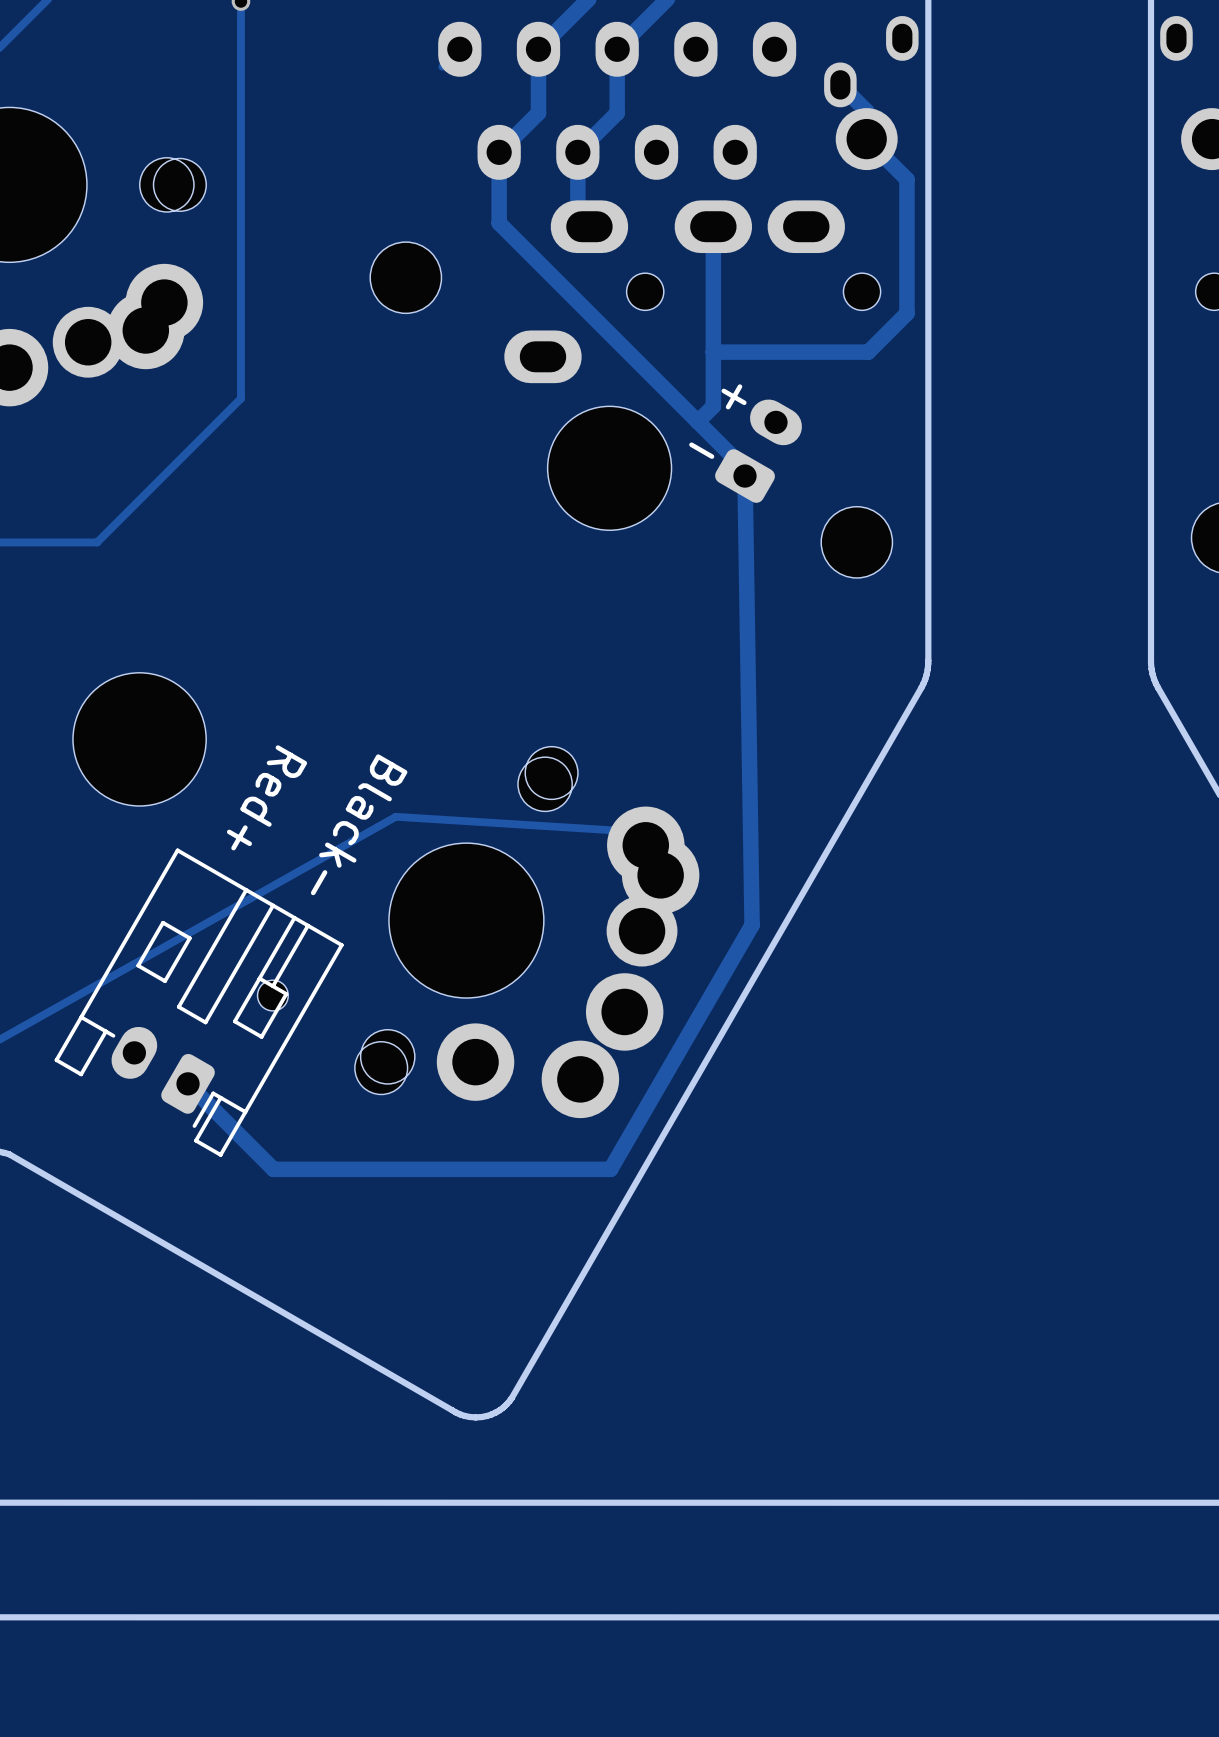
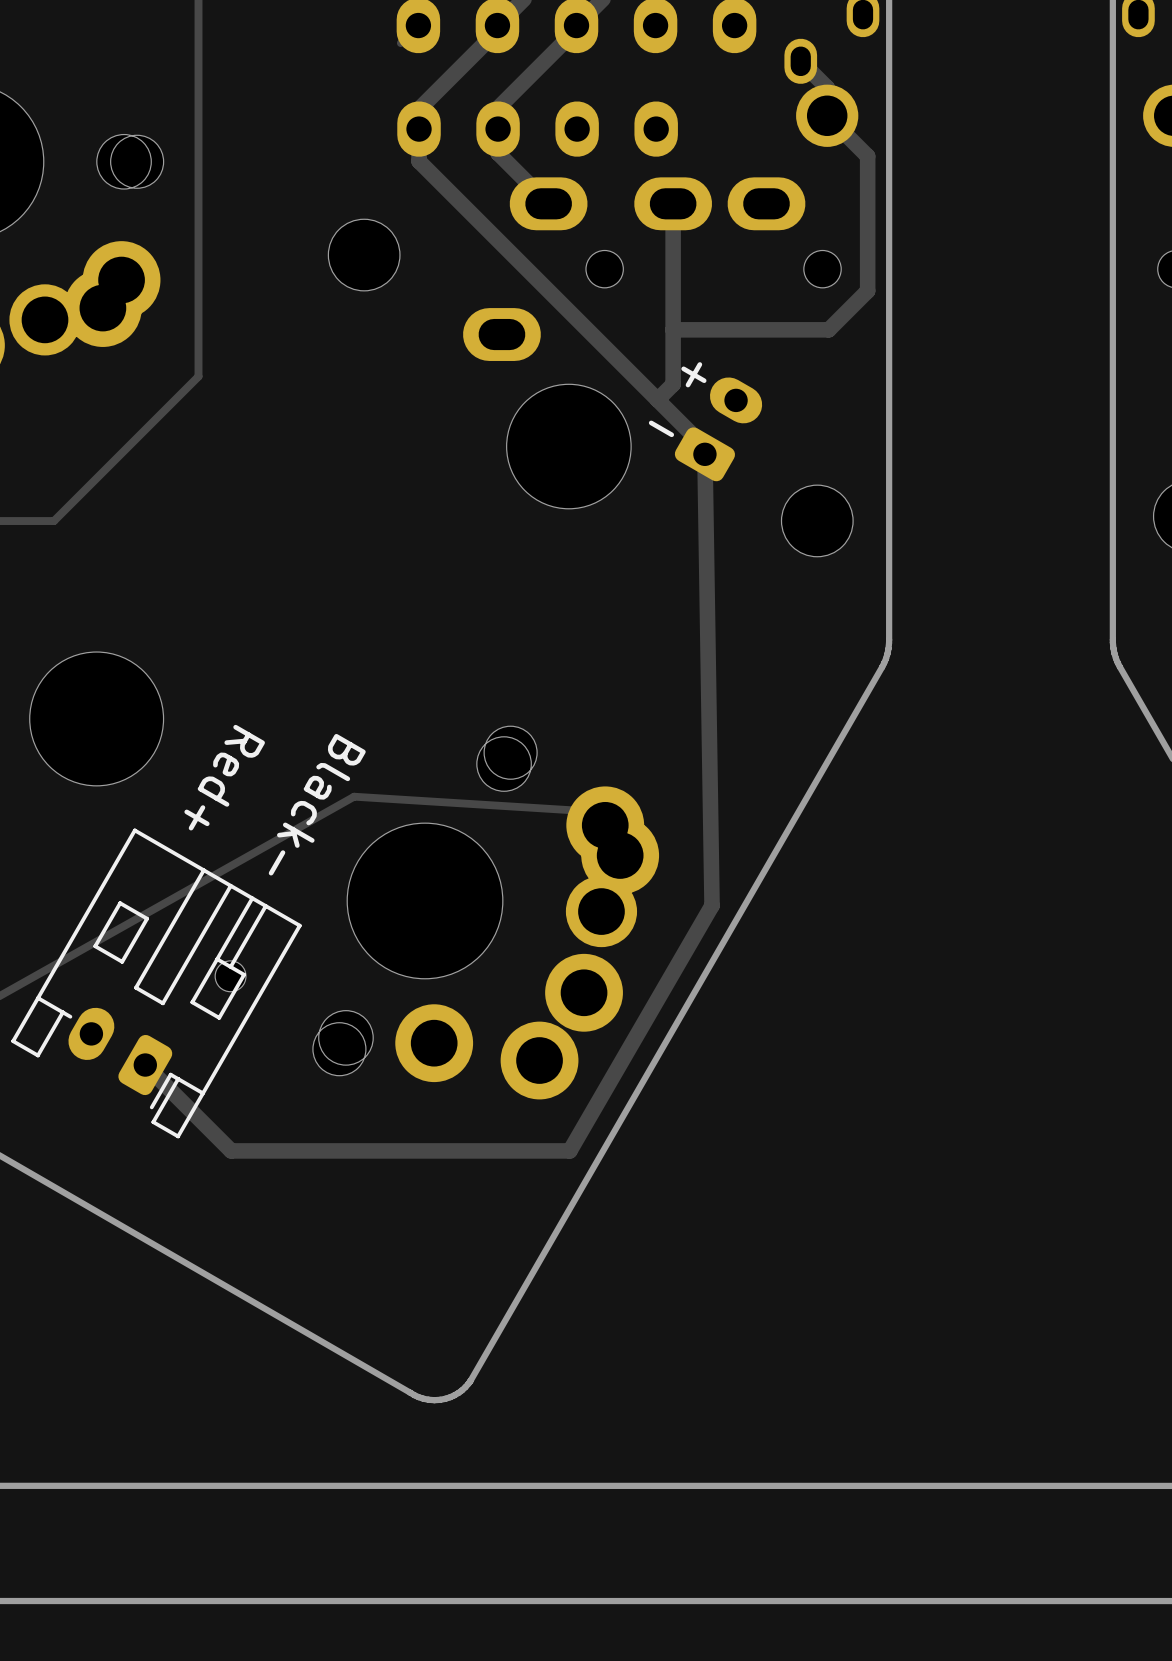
track: (617, 53) (617, 113) (577, 152) (577, 215) -> (576, 29) (498, 108) (498, 153) (536, 192)
track: (538, 54) (538, 113) (499, 152) (499, 223) -> (497, 30) (419, 109) (419, 161) (457, 200)
part position: (617, 152) -> (537, 129)

